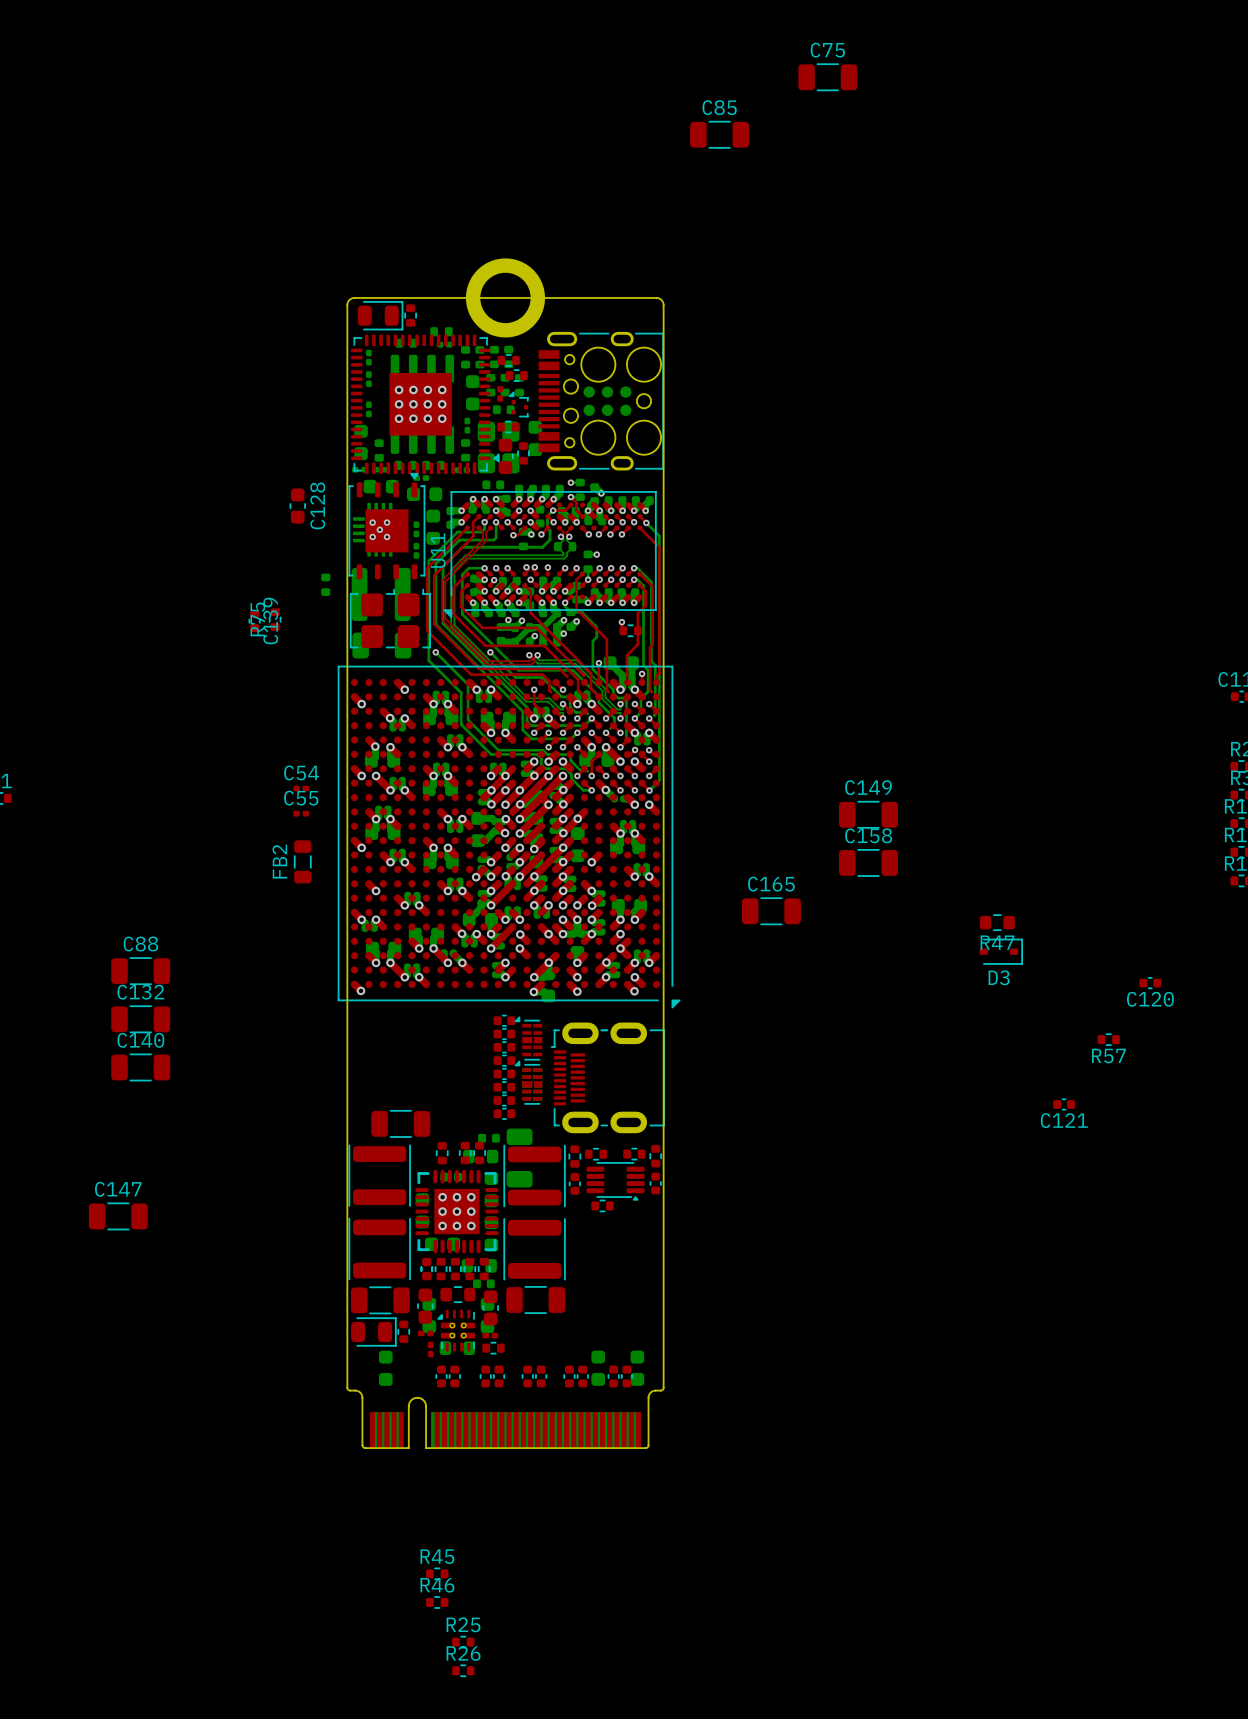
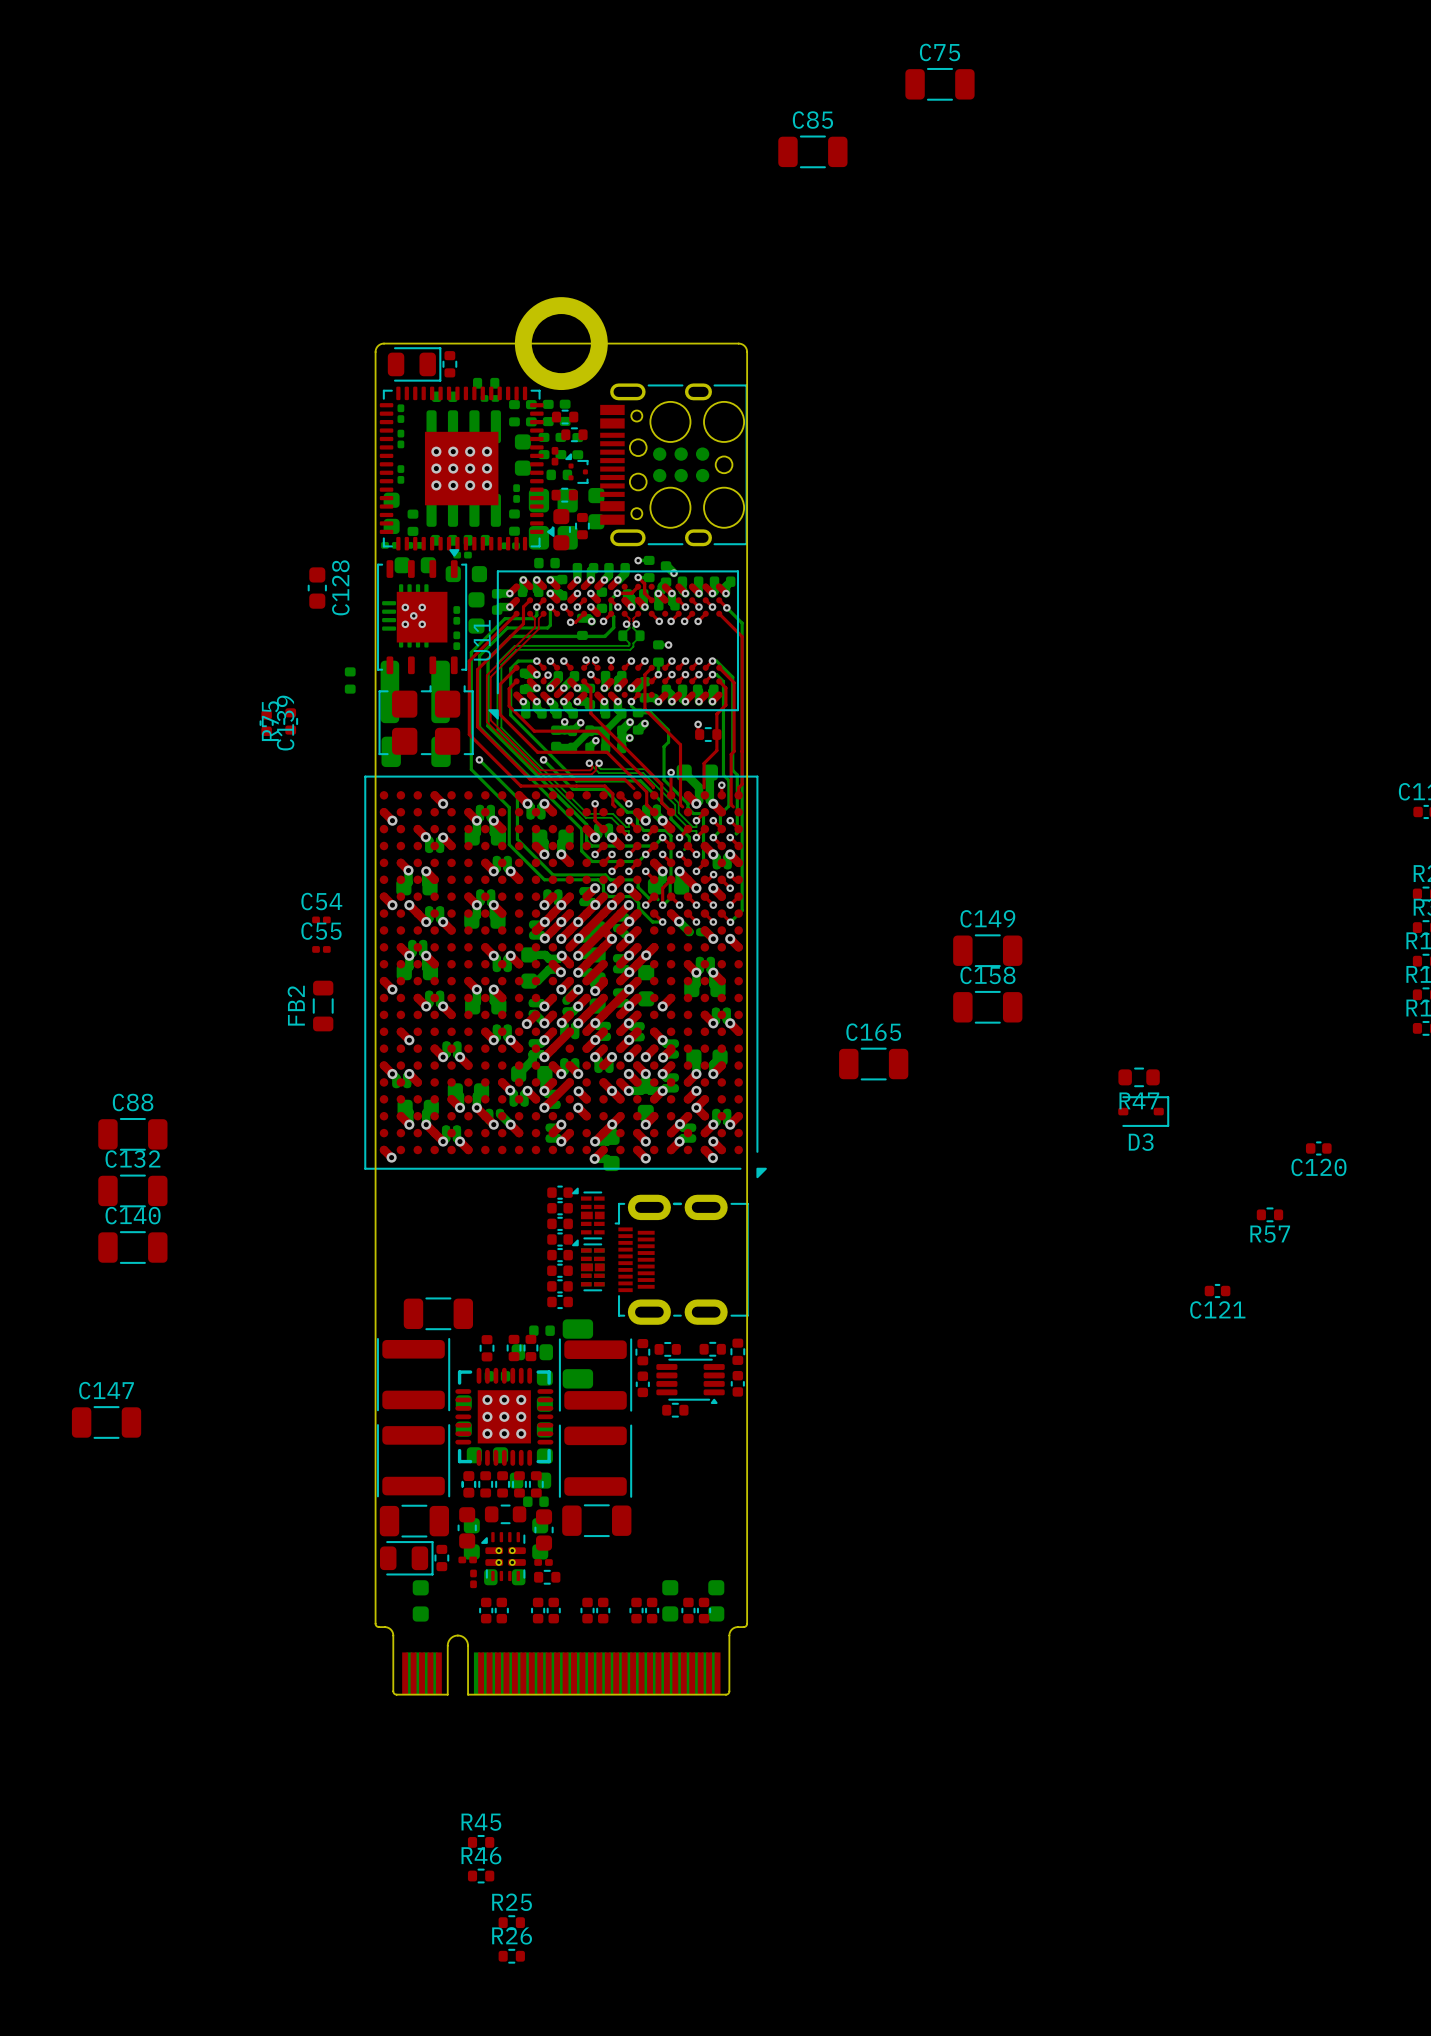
bottom track: (586, 712) (587, 713) -> (656, 830) (665, 830) (671, 835) (670, 898) (662, 904)

